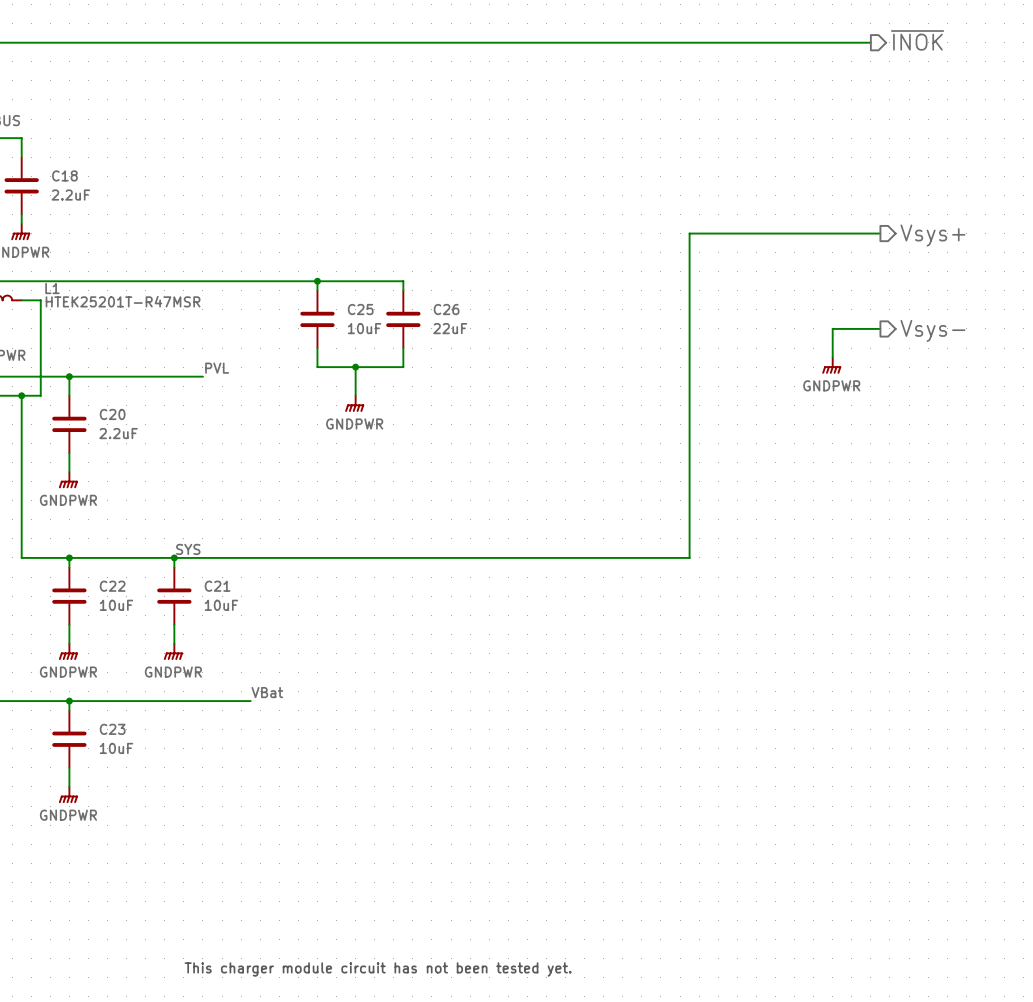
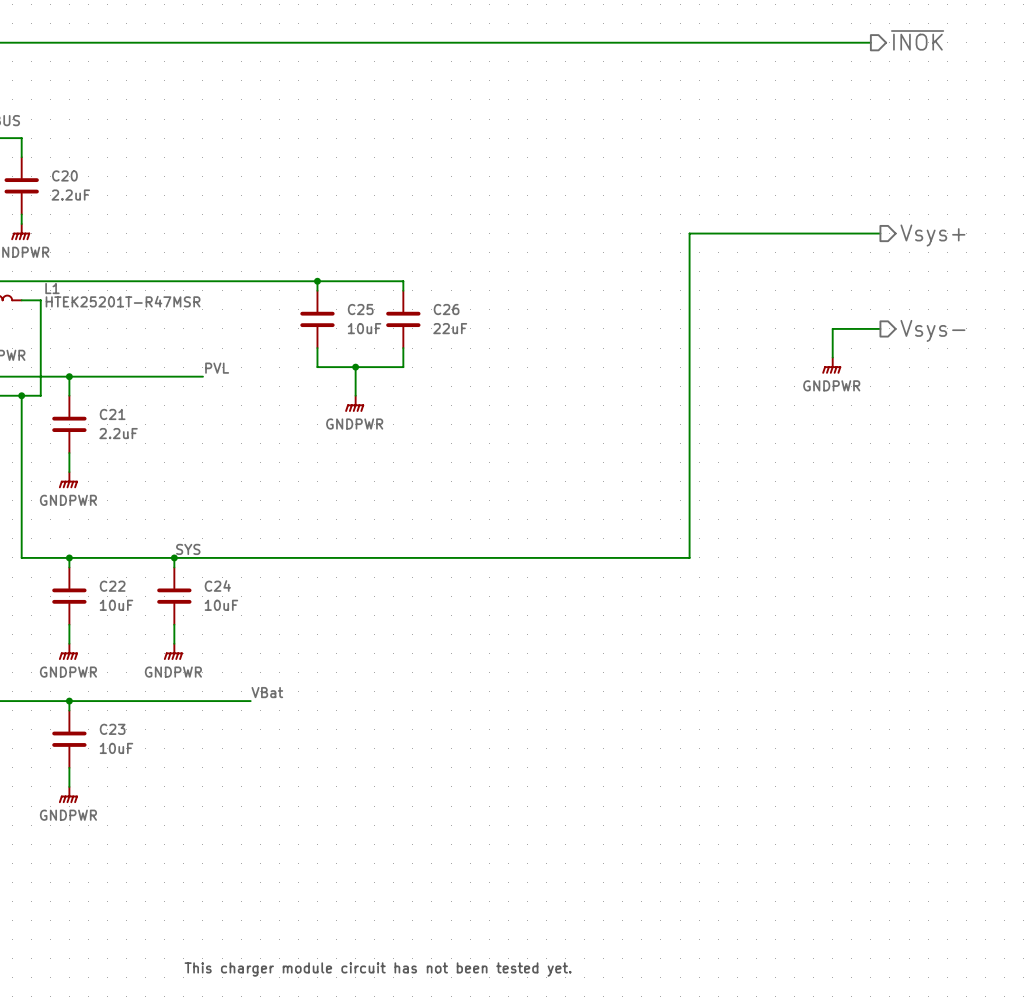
C18 name: C18 (64, 175) -> C20 (64, 175)
C20 name: C20 (112, 414) -> C21 (112, 414)
C21 name: C21 (217, 586) -> C24 (217, 585)

